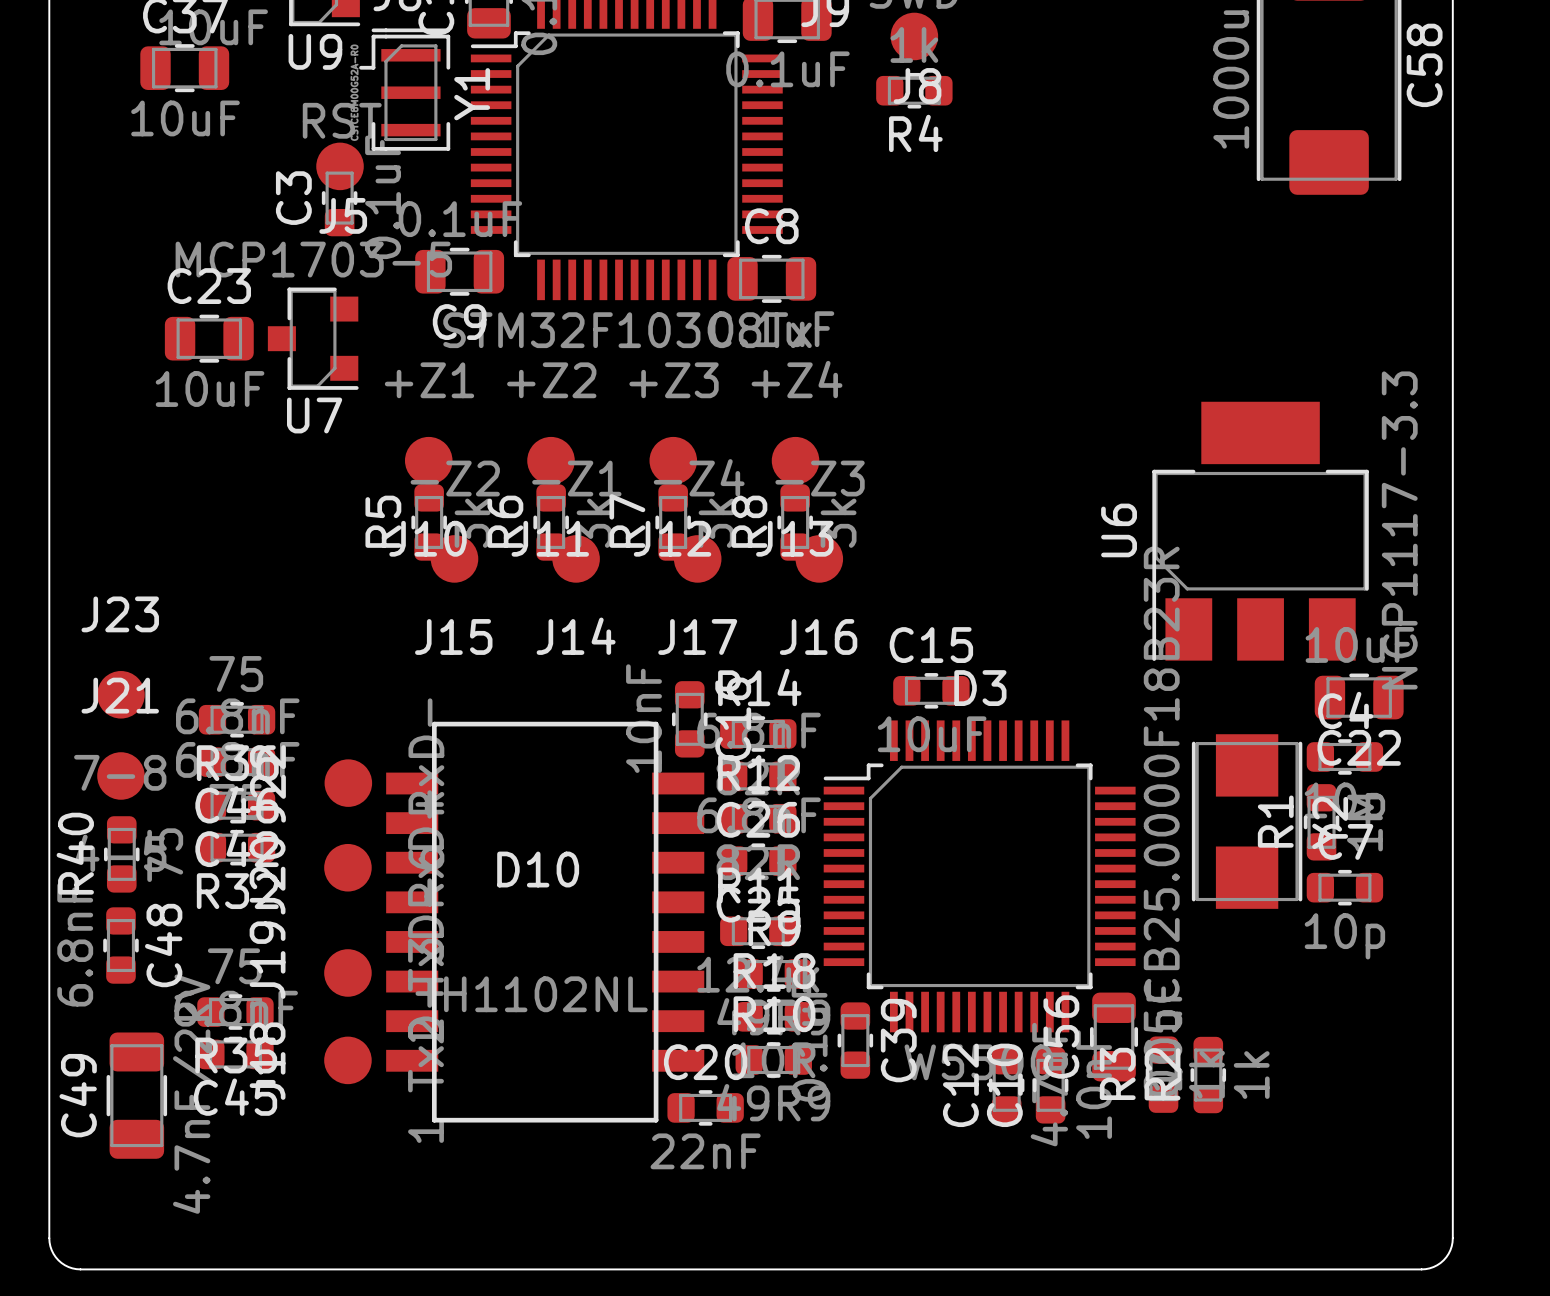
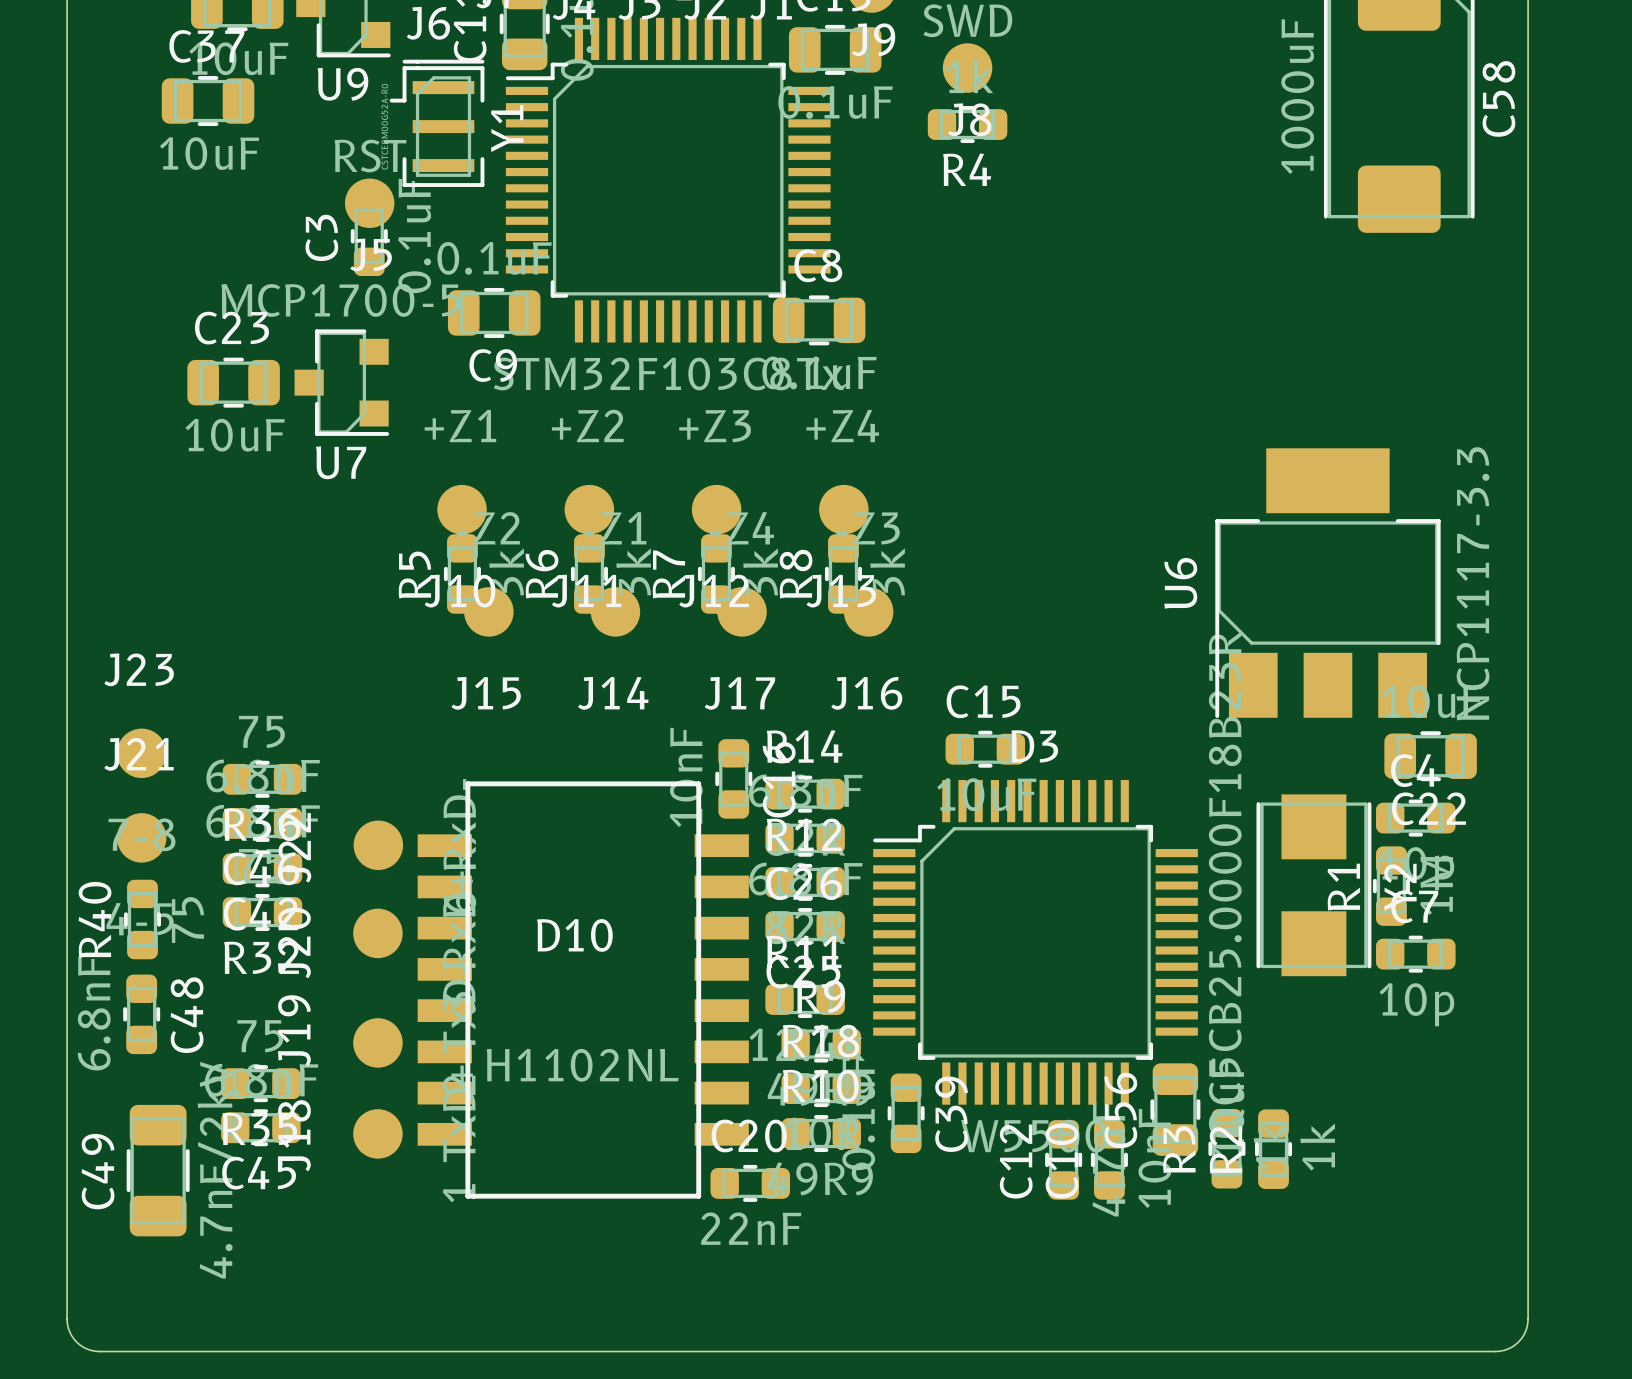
U7 value: MCP1703-5 (313, 259) -> MCP1700-5 (340, 300)

